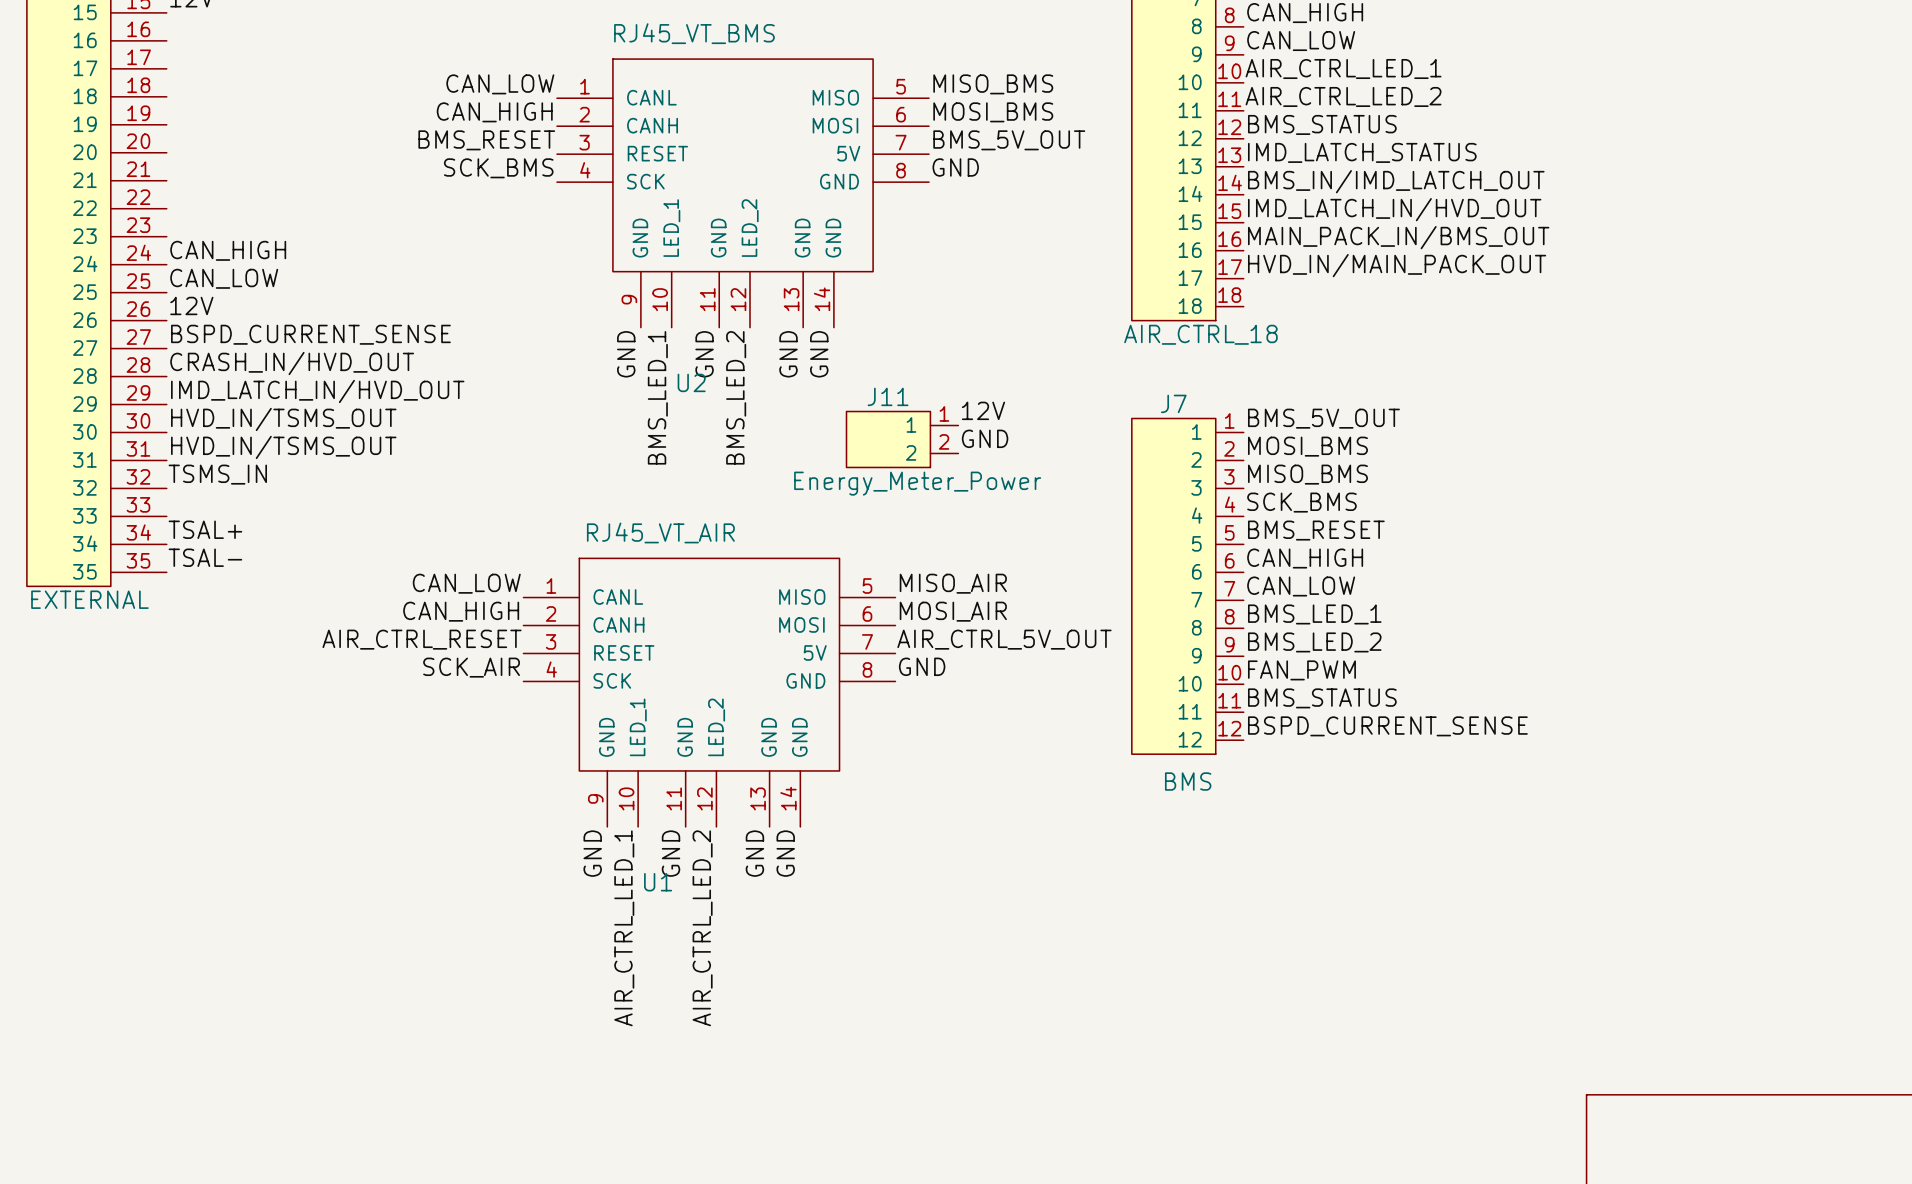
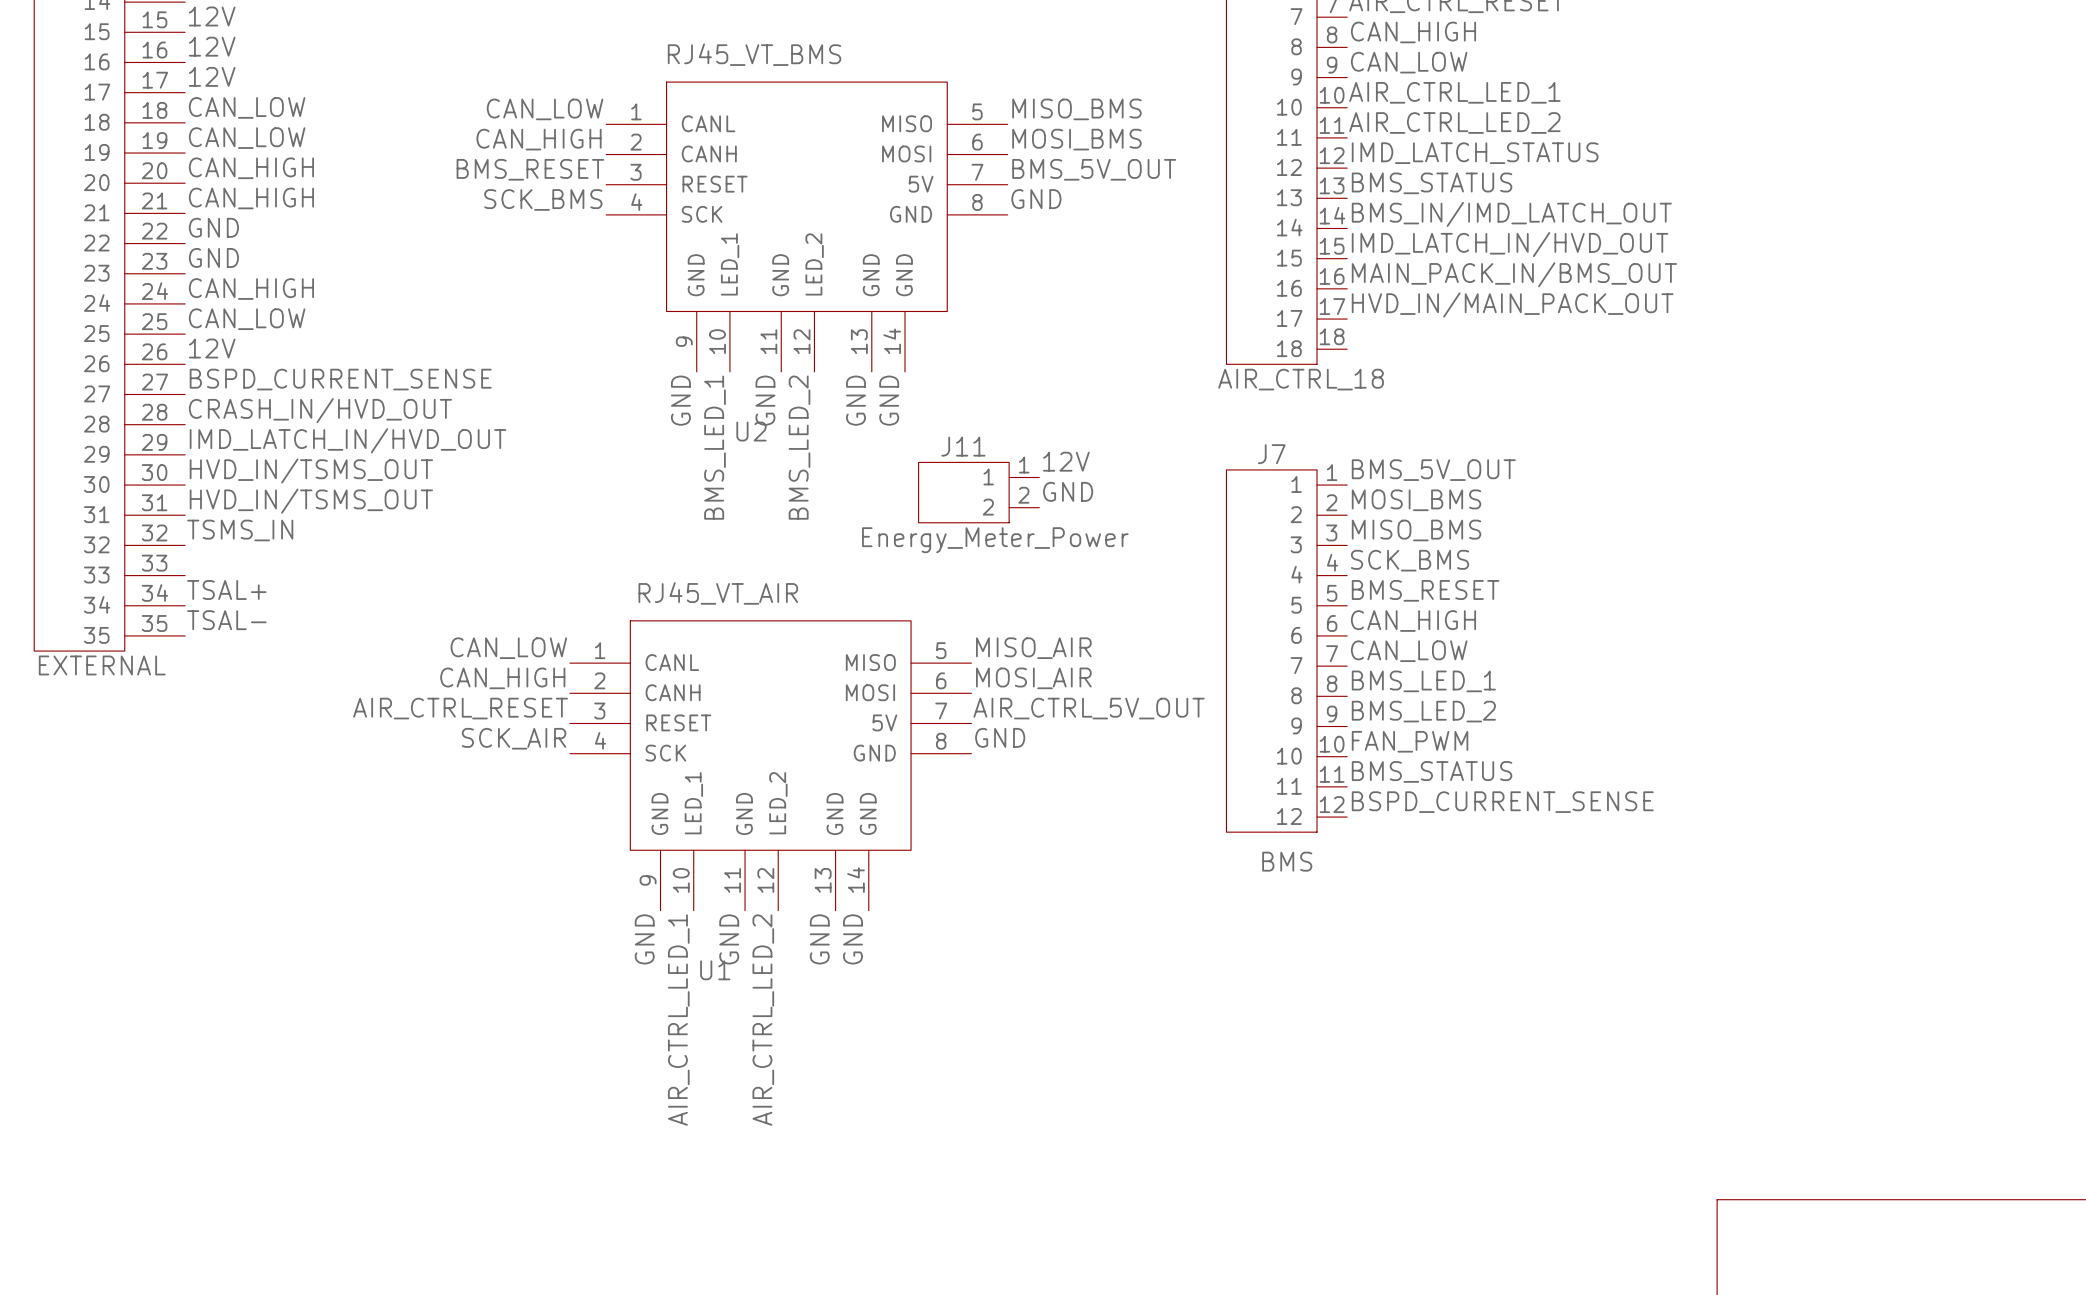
label: none -> 12V (212, 46)
label: none -> 12V (212, 76)
label: none -> CAN_LOW (247, 107)
label: none -> CAN_LOW (247, 138)
label: BMS_STATUS (1322, 124) -> IMD_LATCH_STATUS (1475, 153)
label: none -> CAN_HIGH (251, 168)
label: IMD_LATCH_STATUS (1362, 152) -> BMS_STATUS (1432, 183)
label: none -> CAN_HIGH (251, 198)
label: none -> GND (213, 227)
label: none -> GND (213, 257)

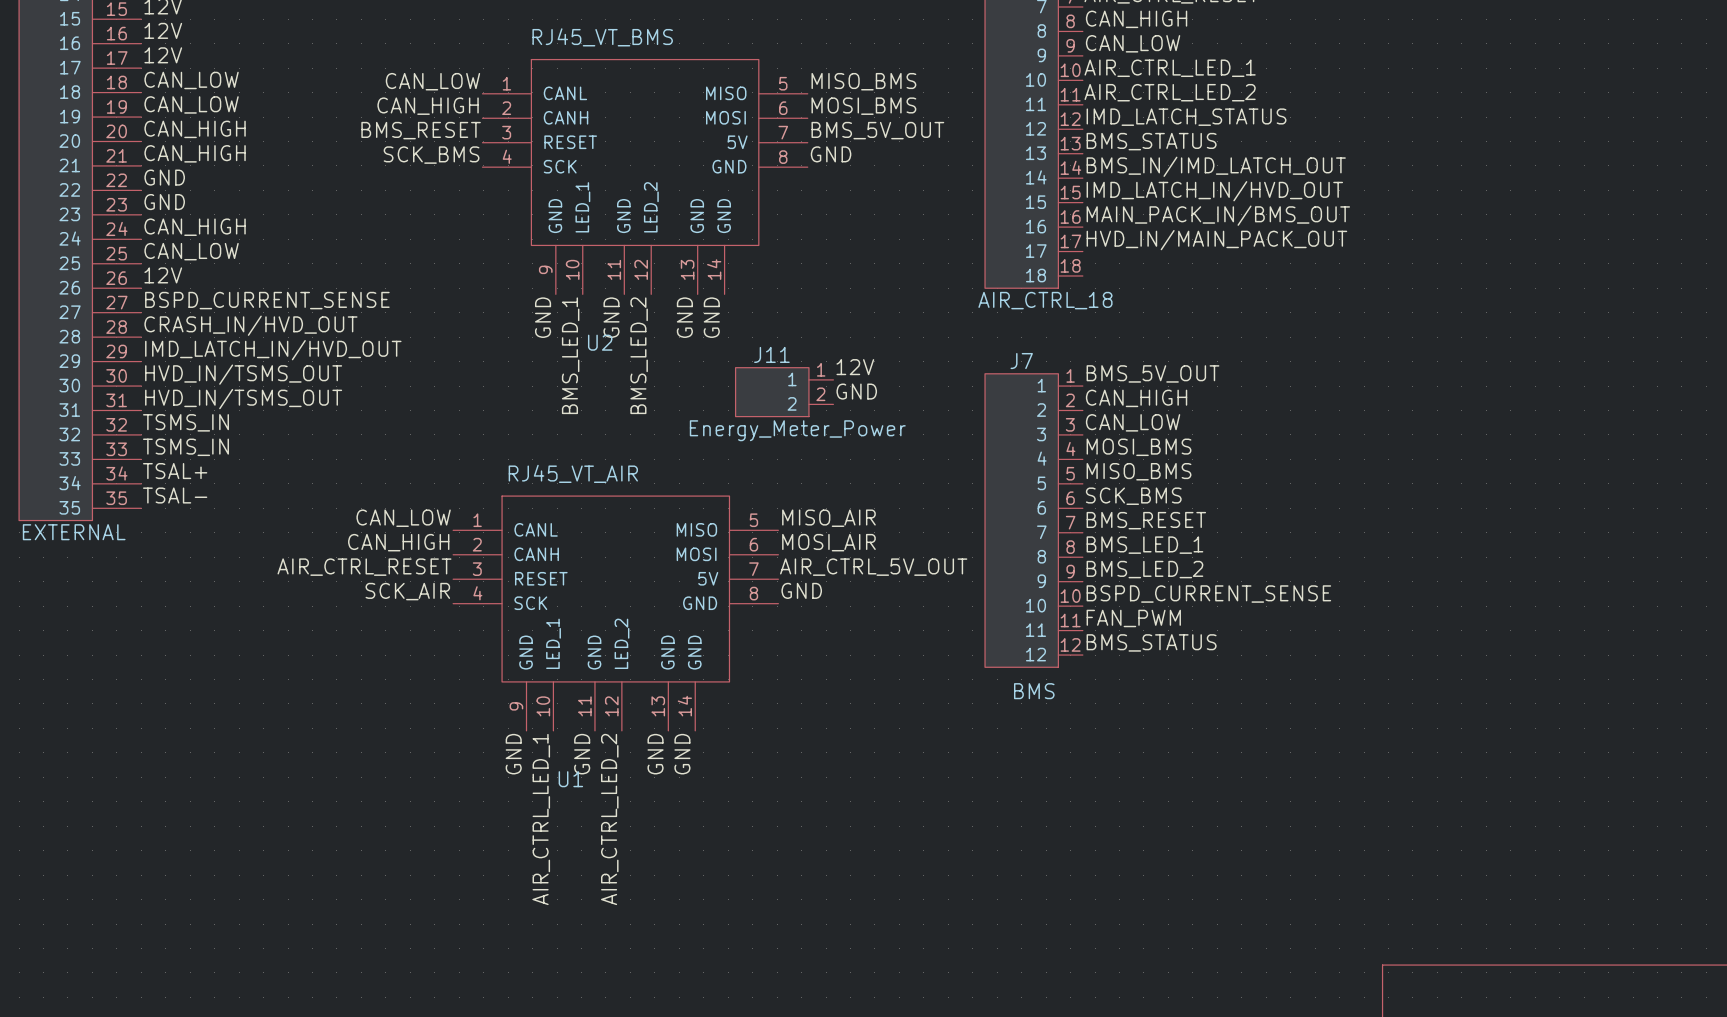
label: MOSI_BMS (1416, 500) -> CAN_HIGH (1136, 398)
label: MISO_BMS (1416, 530) -> CAN_LOW (1133, 422)
label: none -> TSMS_IN (185, 447)
label: SCK_BMS (1410, 560) -> MOSI_BMS (1139, 447)
label: BMS_RESET (1425, 590) -> MISO_BMS (1139, 471)
label: CAN_HIGH (1413, 621) -> SCK_BMS (1133, 496)
label: CAN_LOW (1409, 651) -> BMS_RESET (1146, 520)
label: FAN_PWM (1410, 741) -> BSPD_CURRENT_SENSE (1208, 594)
label: BMS_STATUS (1432, 771) -> FAN_PWM (1133, 618)
label: BSPD_CURRENT_SENSE (1502, 802) -> BMS_STATUS (1151, 642)

